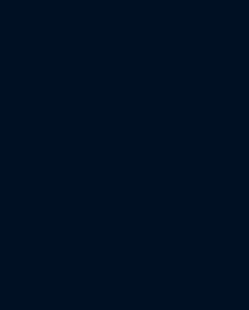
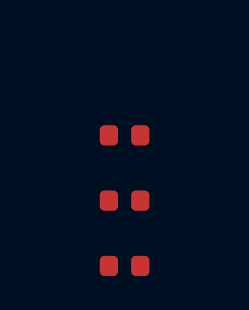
part: none -> (124, 135)
part: none -> (124, 200)
part: none -> (124, 265)

